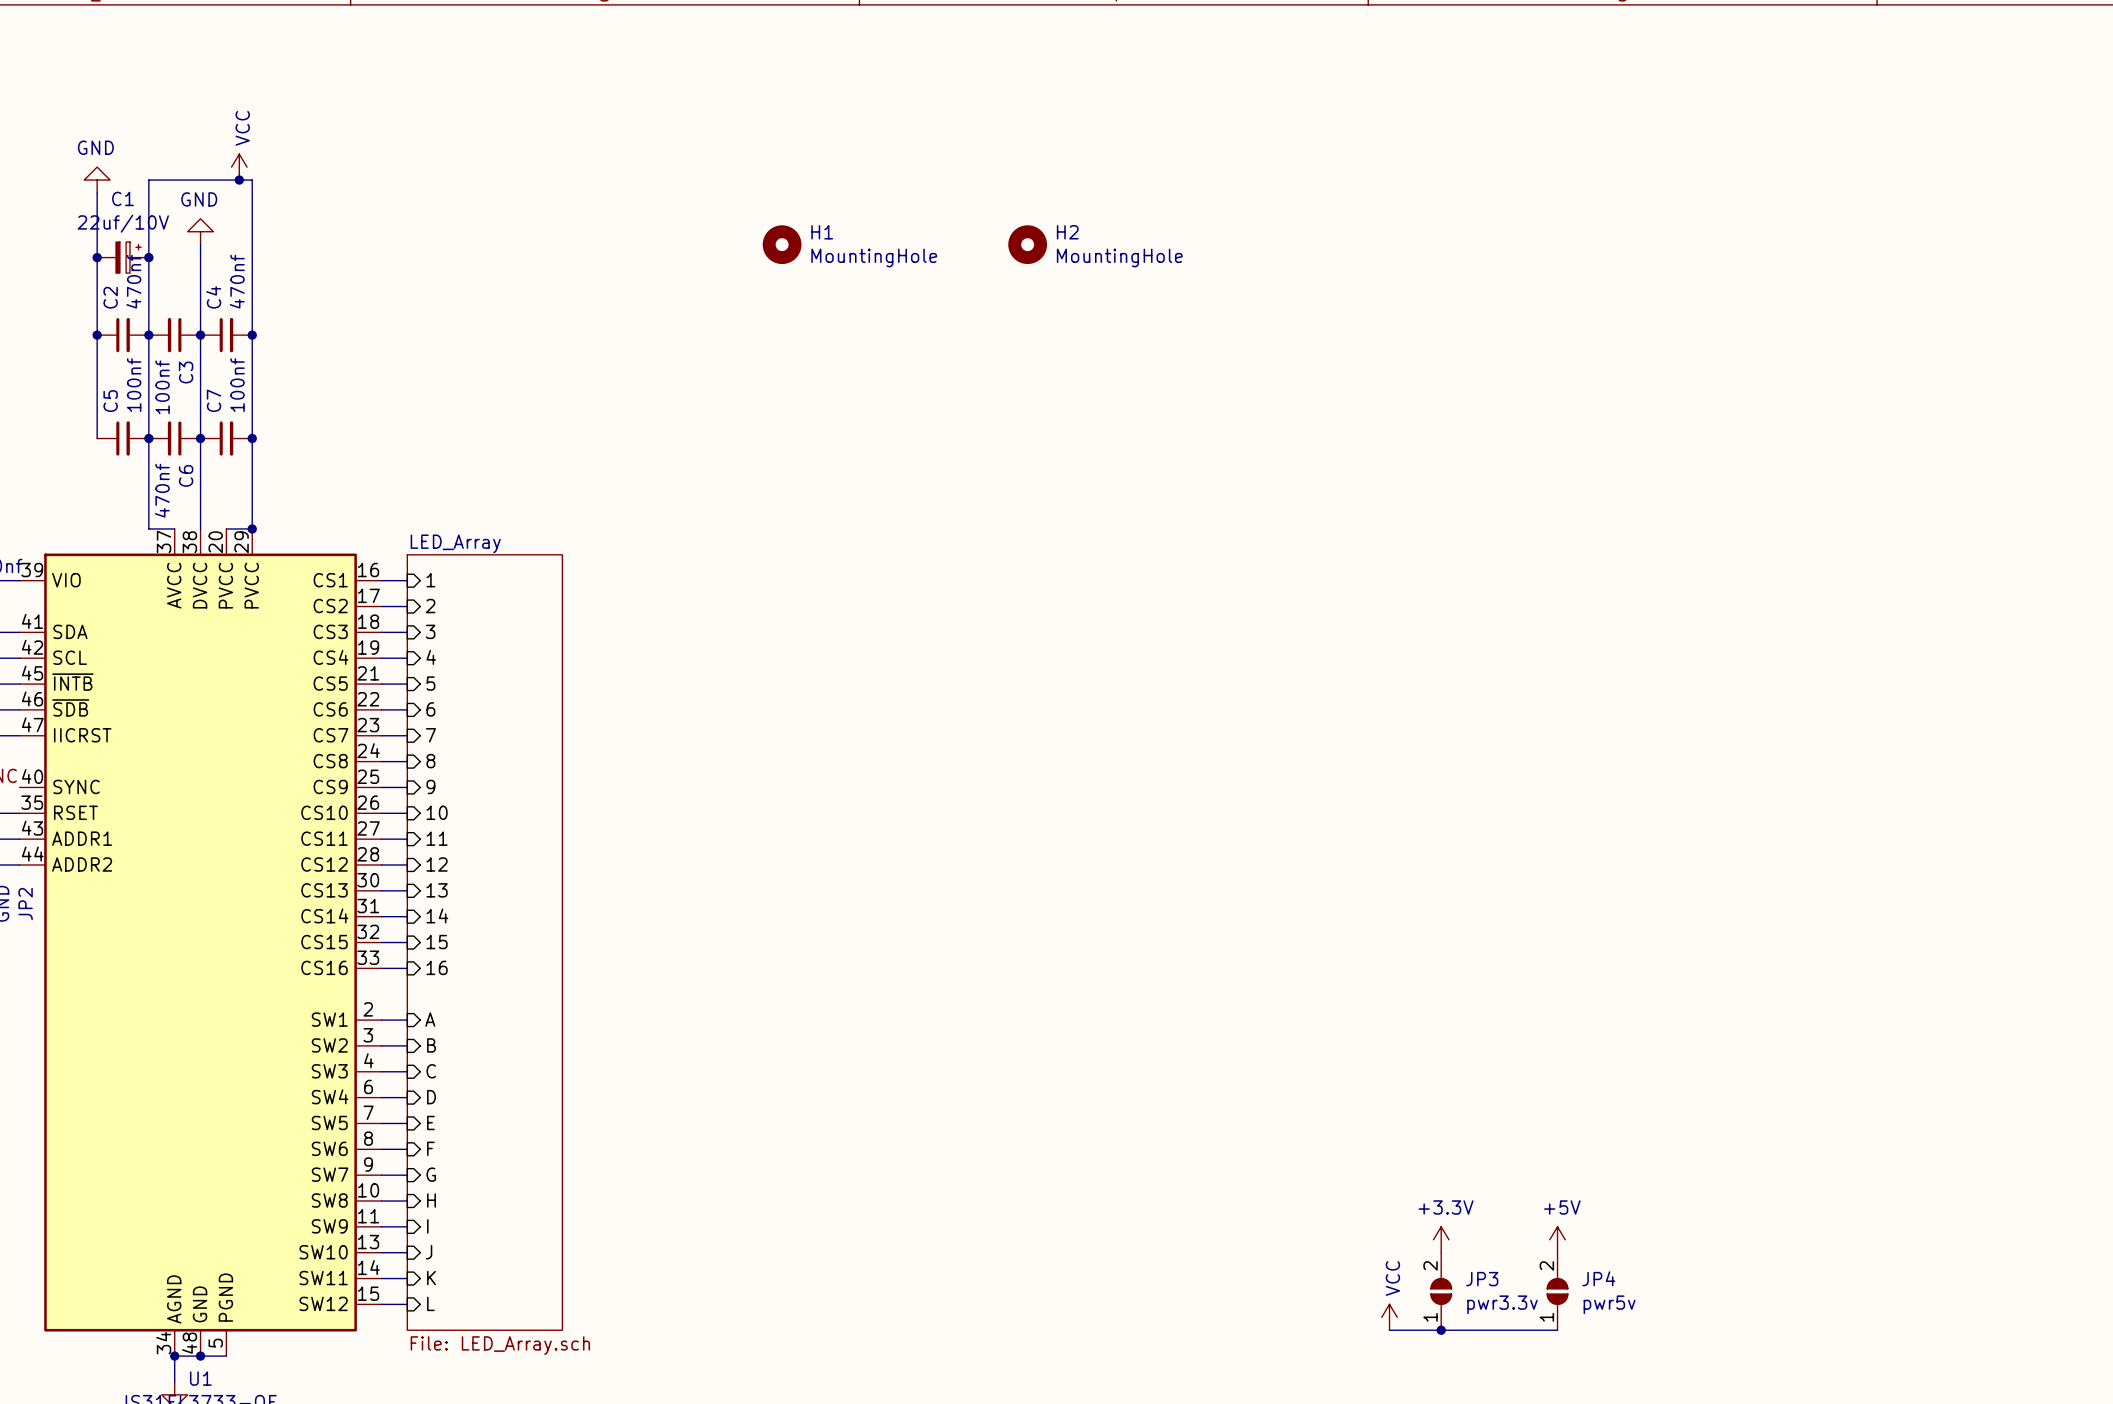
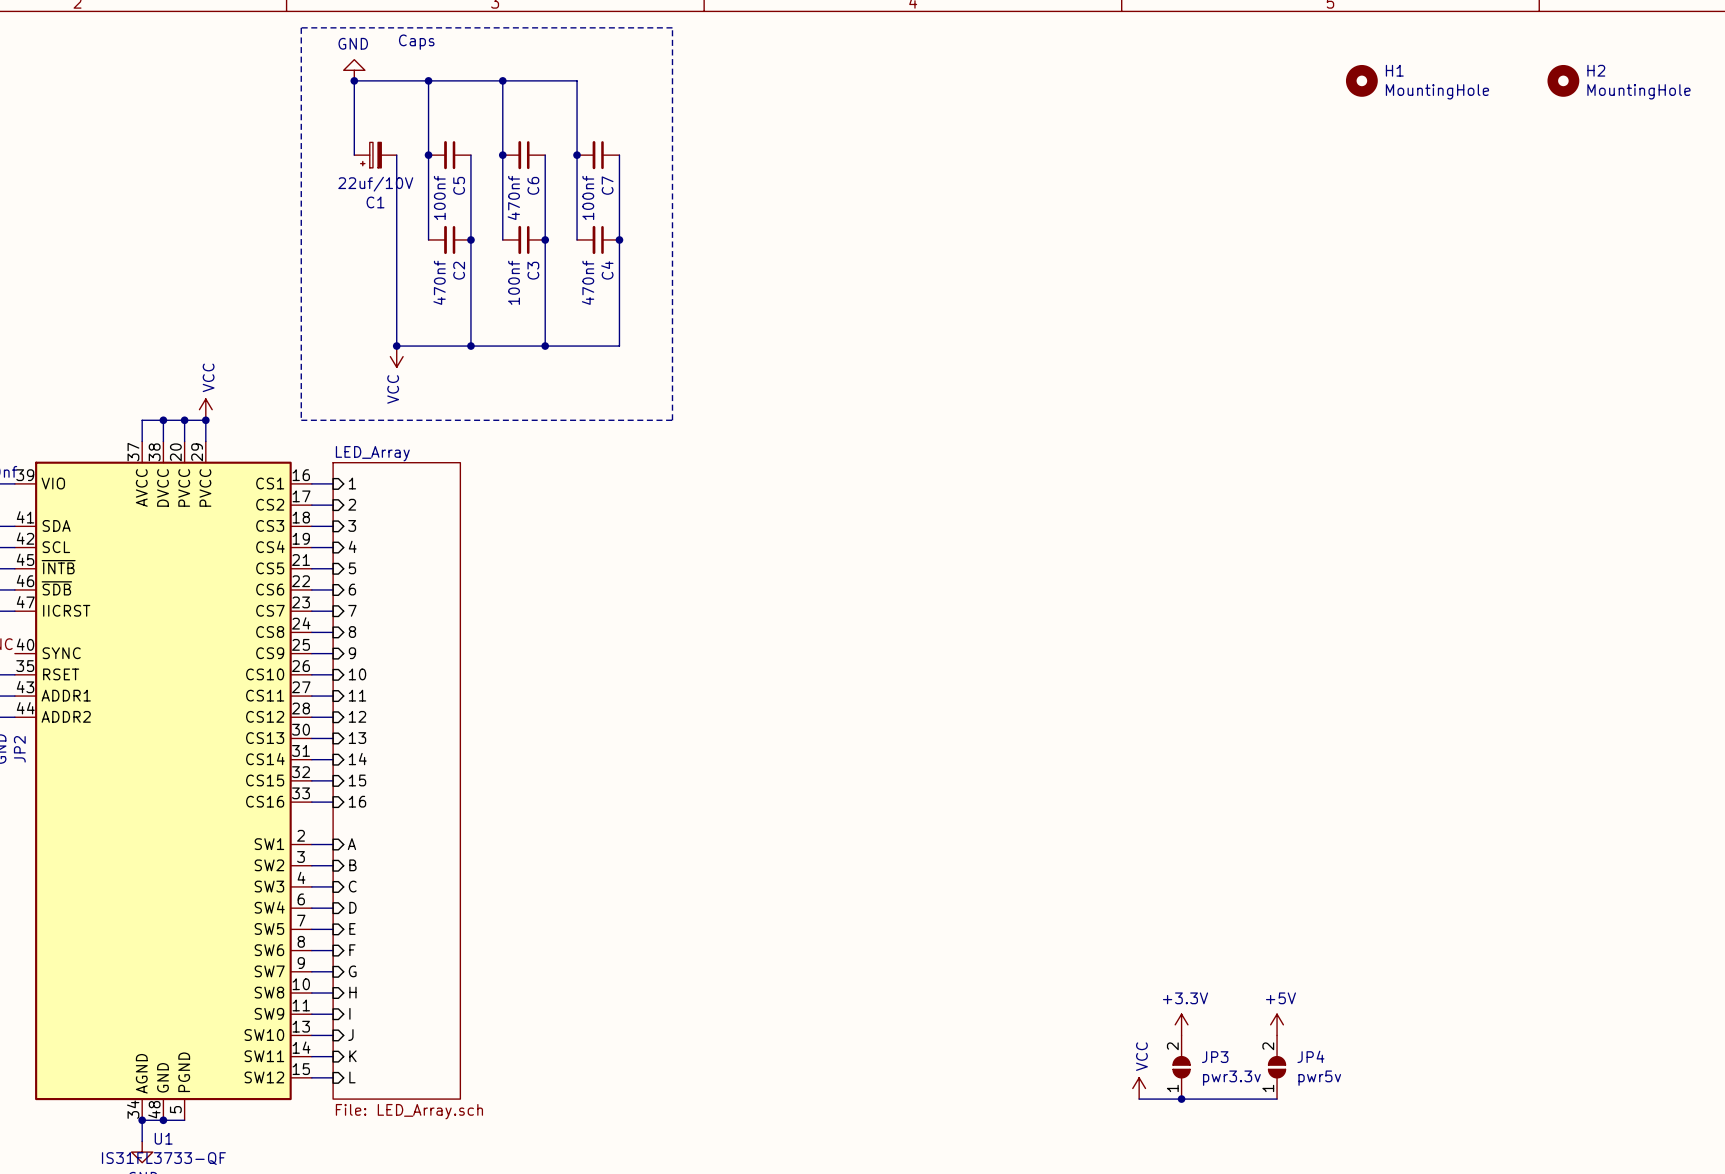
line: none -> (301, 27) (301, 420) (672, 420) (672, 27) (301, 27)
text: none -> Caps (416, 42)
power symbol: none -> GND (354, 70)
junction: none -> (354, 80)
wire: none -> (428, 80) (428, 239)
junction: none -> (428, 80)
wire: none -> (502, 80) (502, 239)
junction: none -> (502, 80)
power symbol: VCC (239, 167) -> none
power symbol: GND (97, 180) -> none
junction: (239, 180) -> none
wire: none -> (354, 155) (354, 80) (577, 80) (577, 239)
wire: none -> (396, 155) (396, 346) (619, 346) (619, 155)
junction: none -> (428, 155)
wire: none -> (470, 155) (470, 346)
junction: none -> (502, 155)
wire: none -> (545, 155) (545, 346)
junction: none -> (577, 155)
wire: (97, 192) (97, 438) -> none
power symbol: GND (200, 231) -> none
wire: (200, 244) (200, 503) -> none
H1 position: (782, 244) -> (1361, 80)
H2 position: (1027, 244) -> (1563, 80)
junction: (97, 257) -> none
C1 position: (123, 257) -> (375, 155)
C1 rotation: 0° (128, 257) -> 180° (370, 155)
junction: (148, 257) -> none
junction: none -> (470, 239)
junction: none -> (545, 239)
junction: none -> (619, 239)
junction: (97, 335) -> none
C2 rotation: 0° (123, 335) -> 180° (449, 239)
C2 position: (123, 335) -> (449, 239)
junction: (148, 335) -> none
C3 position: (174, 335) -> (524, 239)
junction: (200, 335) -> none
C4 rotation: 0° (226, 335) -> 180° (598, 239)
C4 position: (226, 335) -> (598, 239)
junction: (252, 335) -> none
junction: none -> (396, 346)
junction: none -> (470, 346)
junction: none -> (545, 346)
power symbol: none -> VCC (396, 356)
C5 rotation: 0° (123, 438) -> 180° (449, 155)
C5 position: (123, 438) -> (449, 155)
junction: (148, 438) -> none
C6 position: (174, 438) -> (524, 155)
junction: (200, 438) -> none
C7 rotation: 0° (226, 438) -> 180° (598, 155)
C7 position: (226, 438) -> (598, 155)
junction: (252, 438) -> none
power symbol: none -> VCC (205, 409)
junction: none -> (163, 420)
junction: none -> (184, 420)
wire: (252, 503) (252, 180) (148, 180) (148, 528) (174, 528) -> (205, 420) (142, 420) (142, 441)
junction: none -> (205, 420)
wire: (226, 528) (252, 528) -> (184, 441) (184, 420)
junction: (252, 528) -> none

